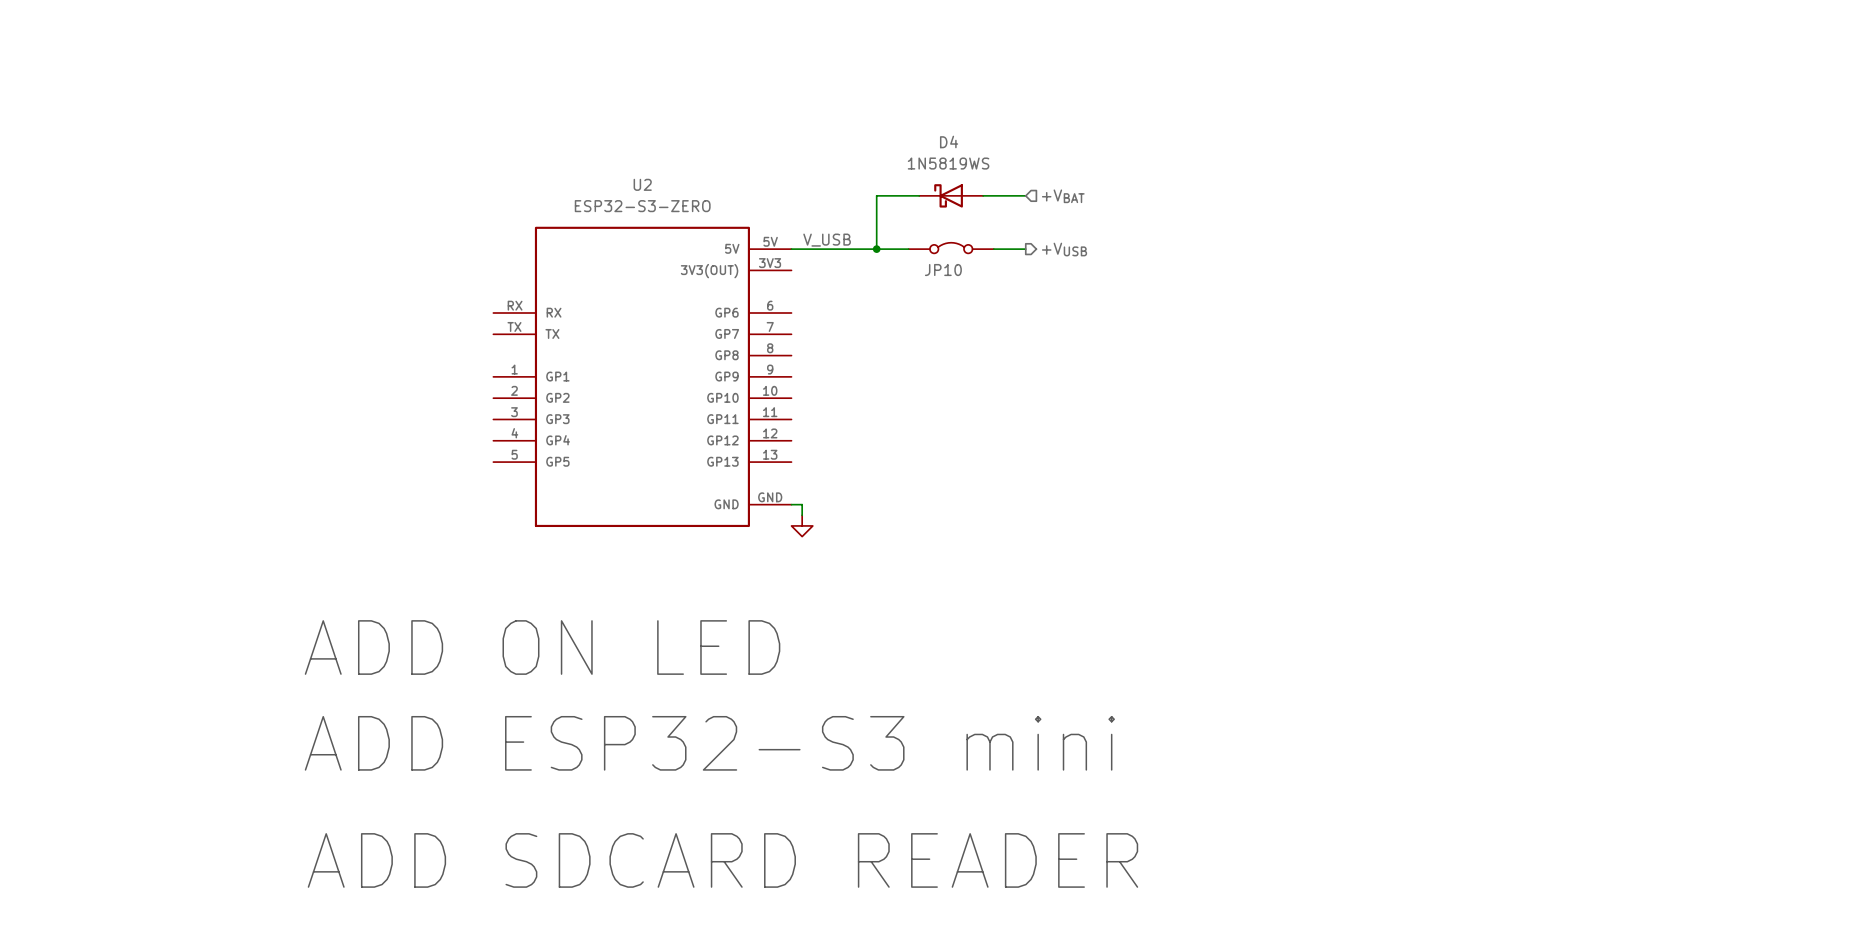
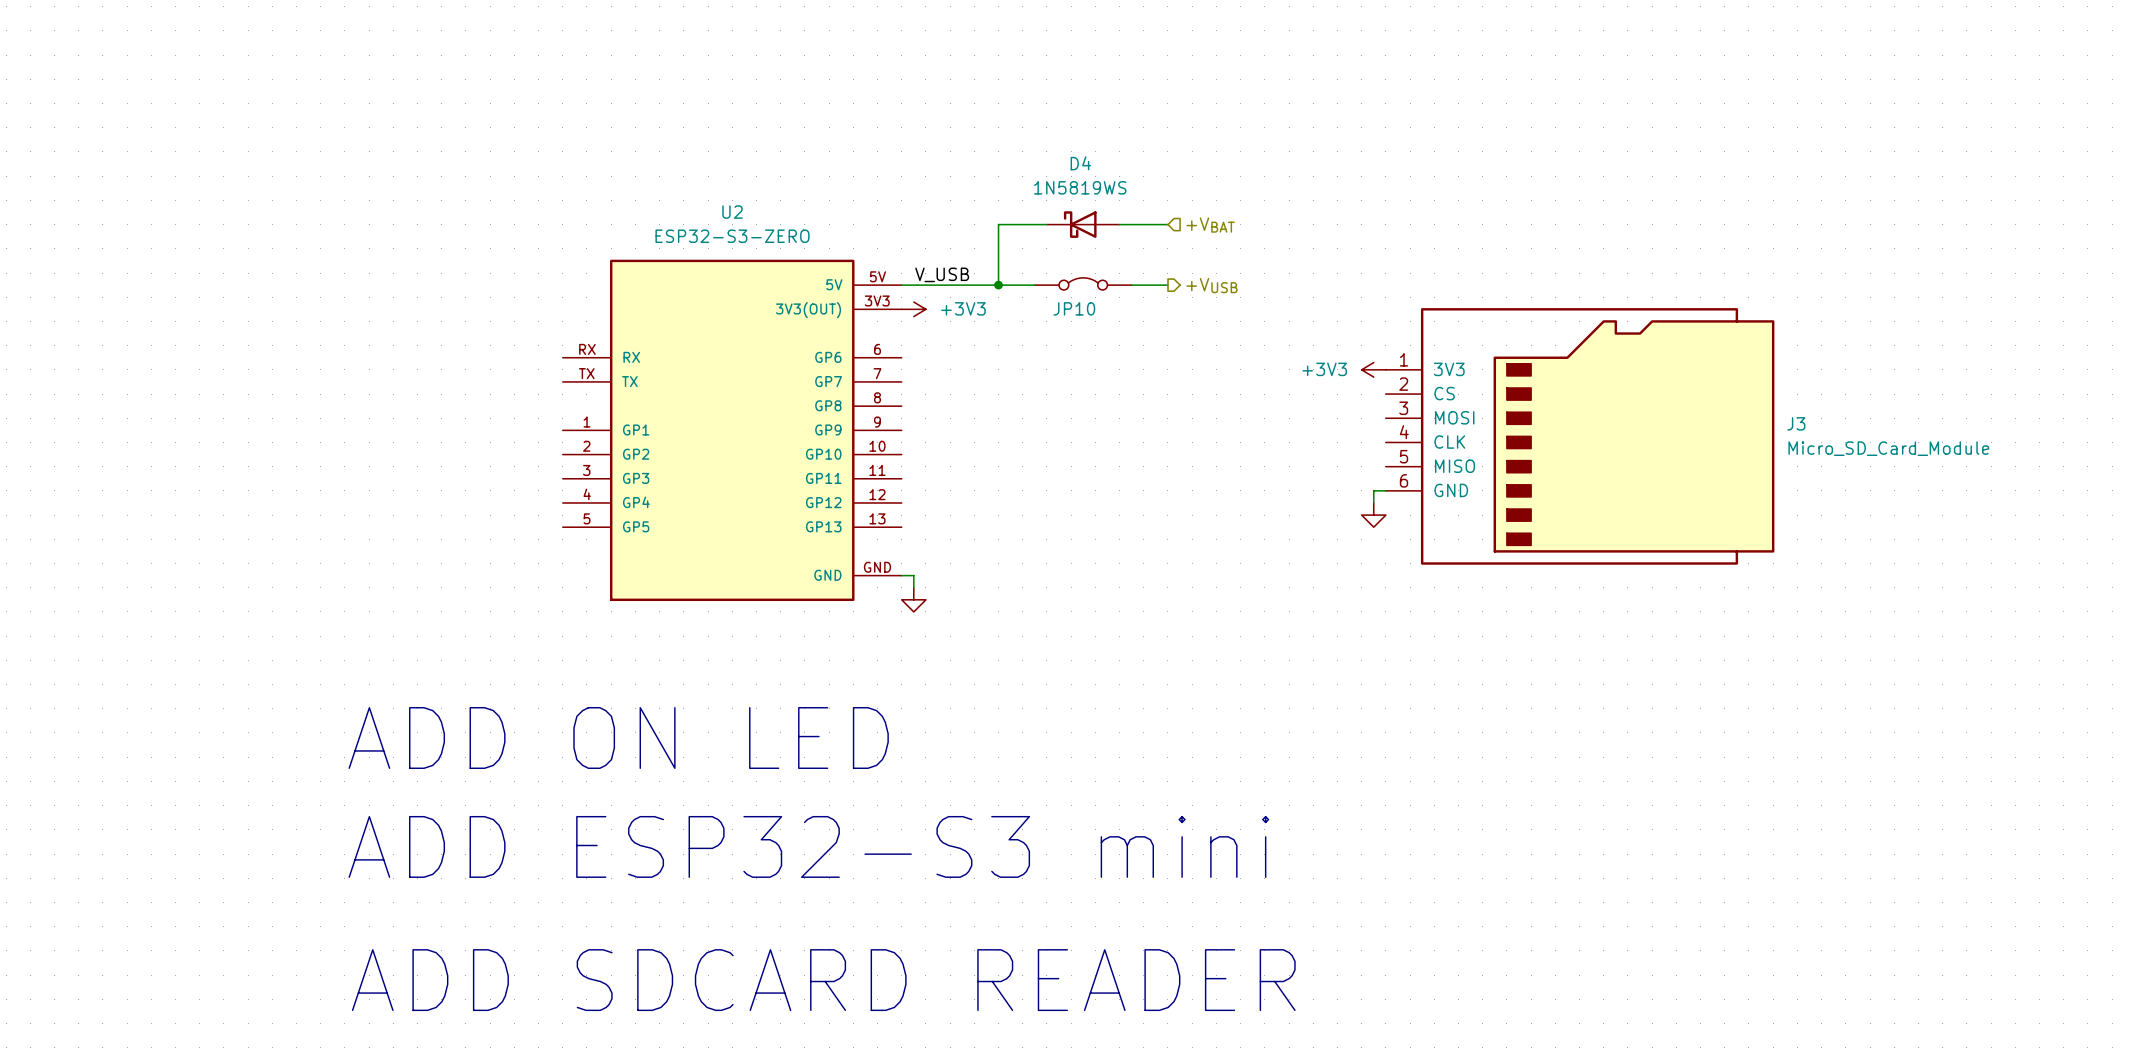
power symbol: none -> +3V3 (913, 309)
power symbol: none -> +3V3 (1373, 369)
J3: none -> Micro_SD_Card_Module (1580, 436)
wire: none -> (1385, 490) (1373, 490) (1373, 502)
power symbol: none -> (1373, 515)

